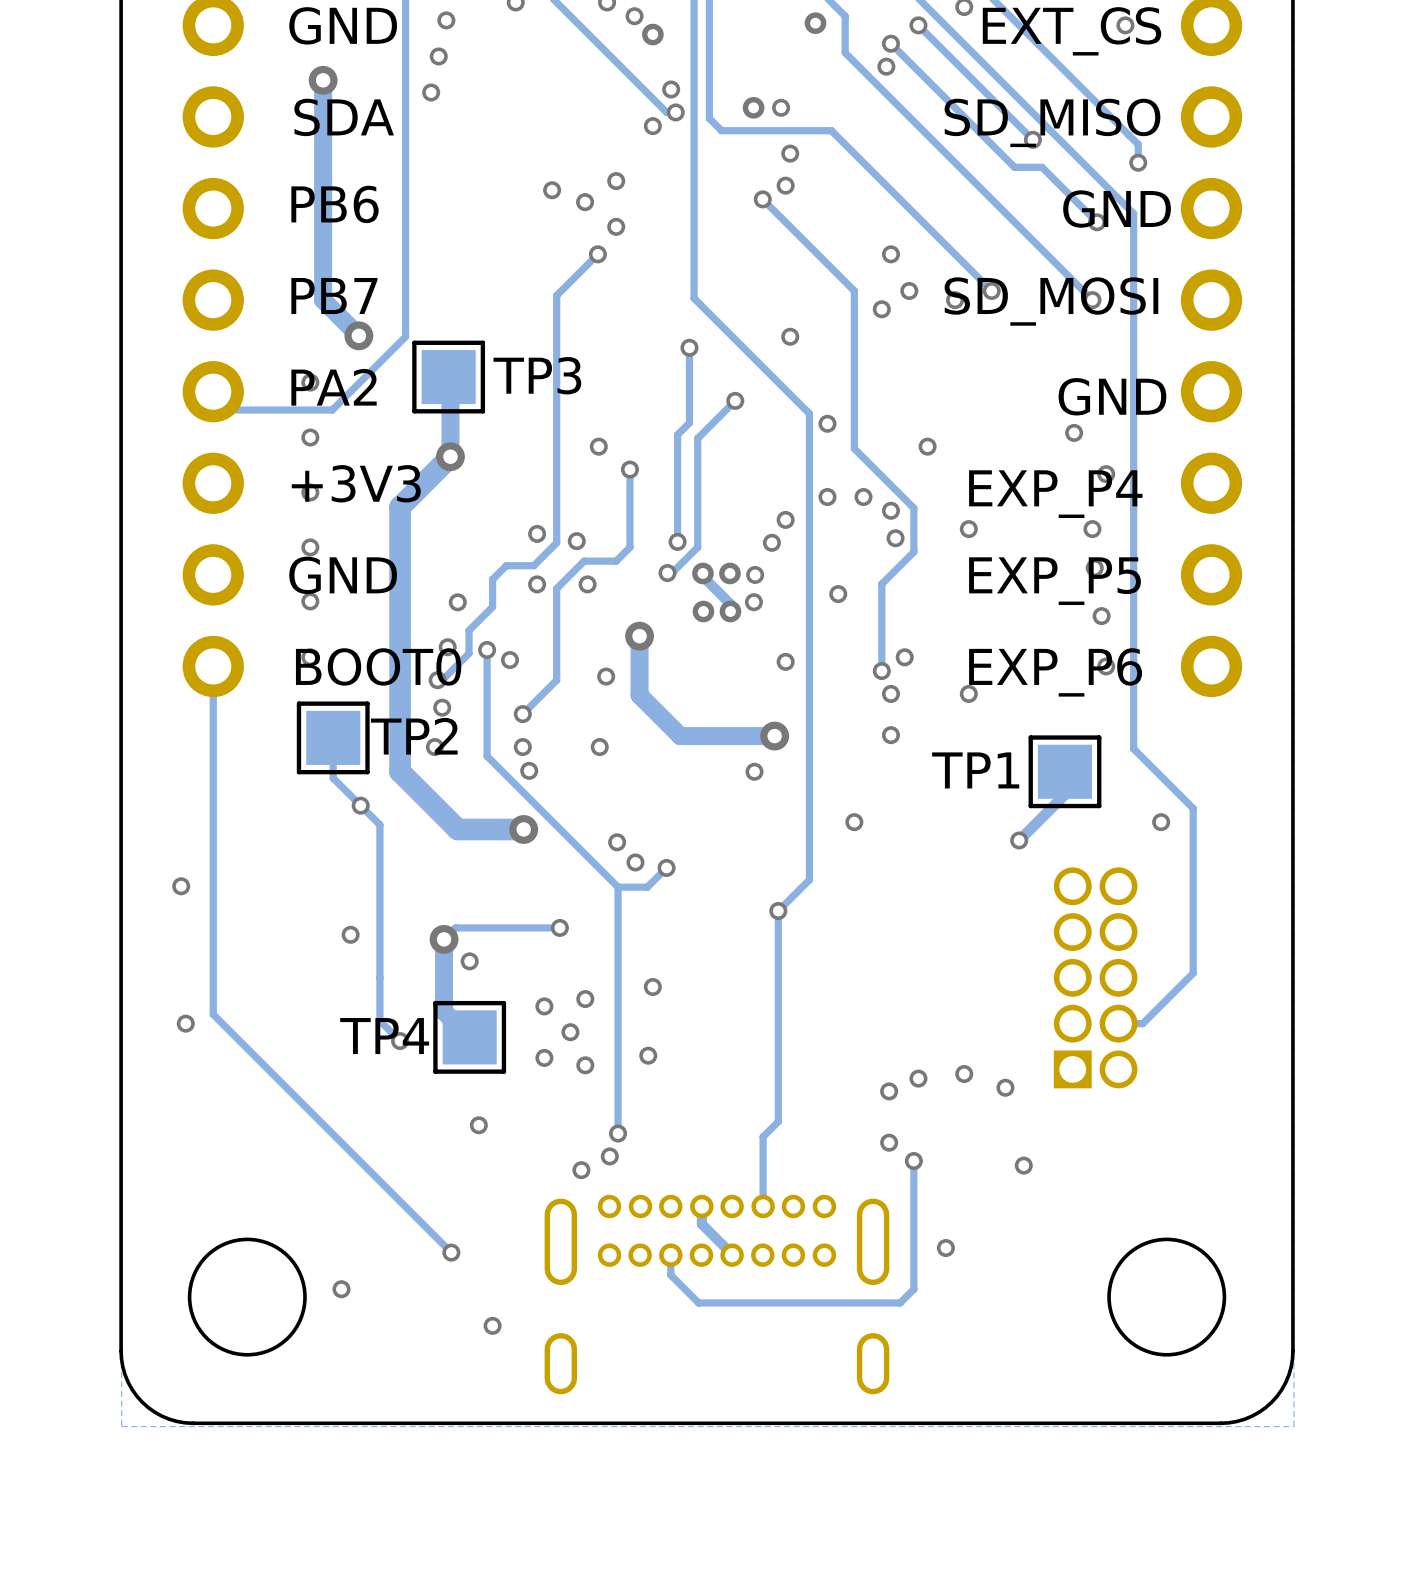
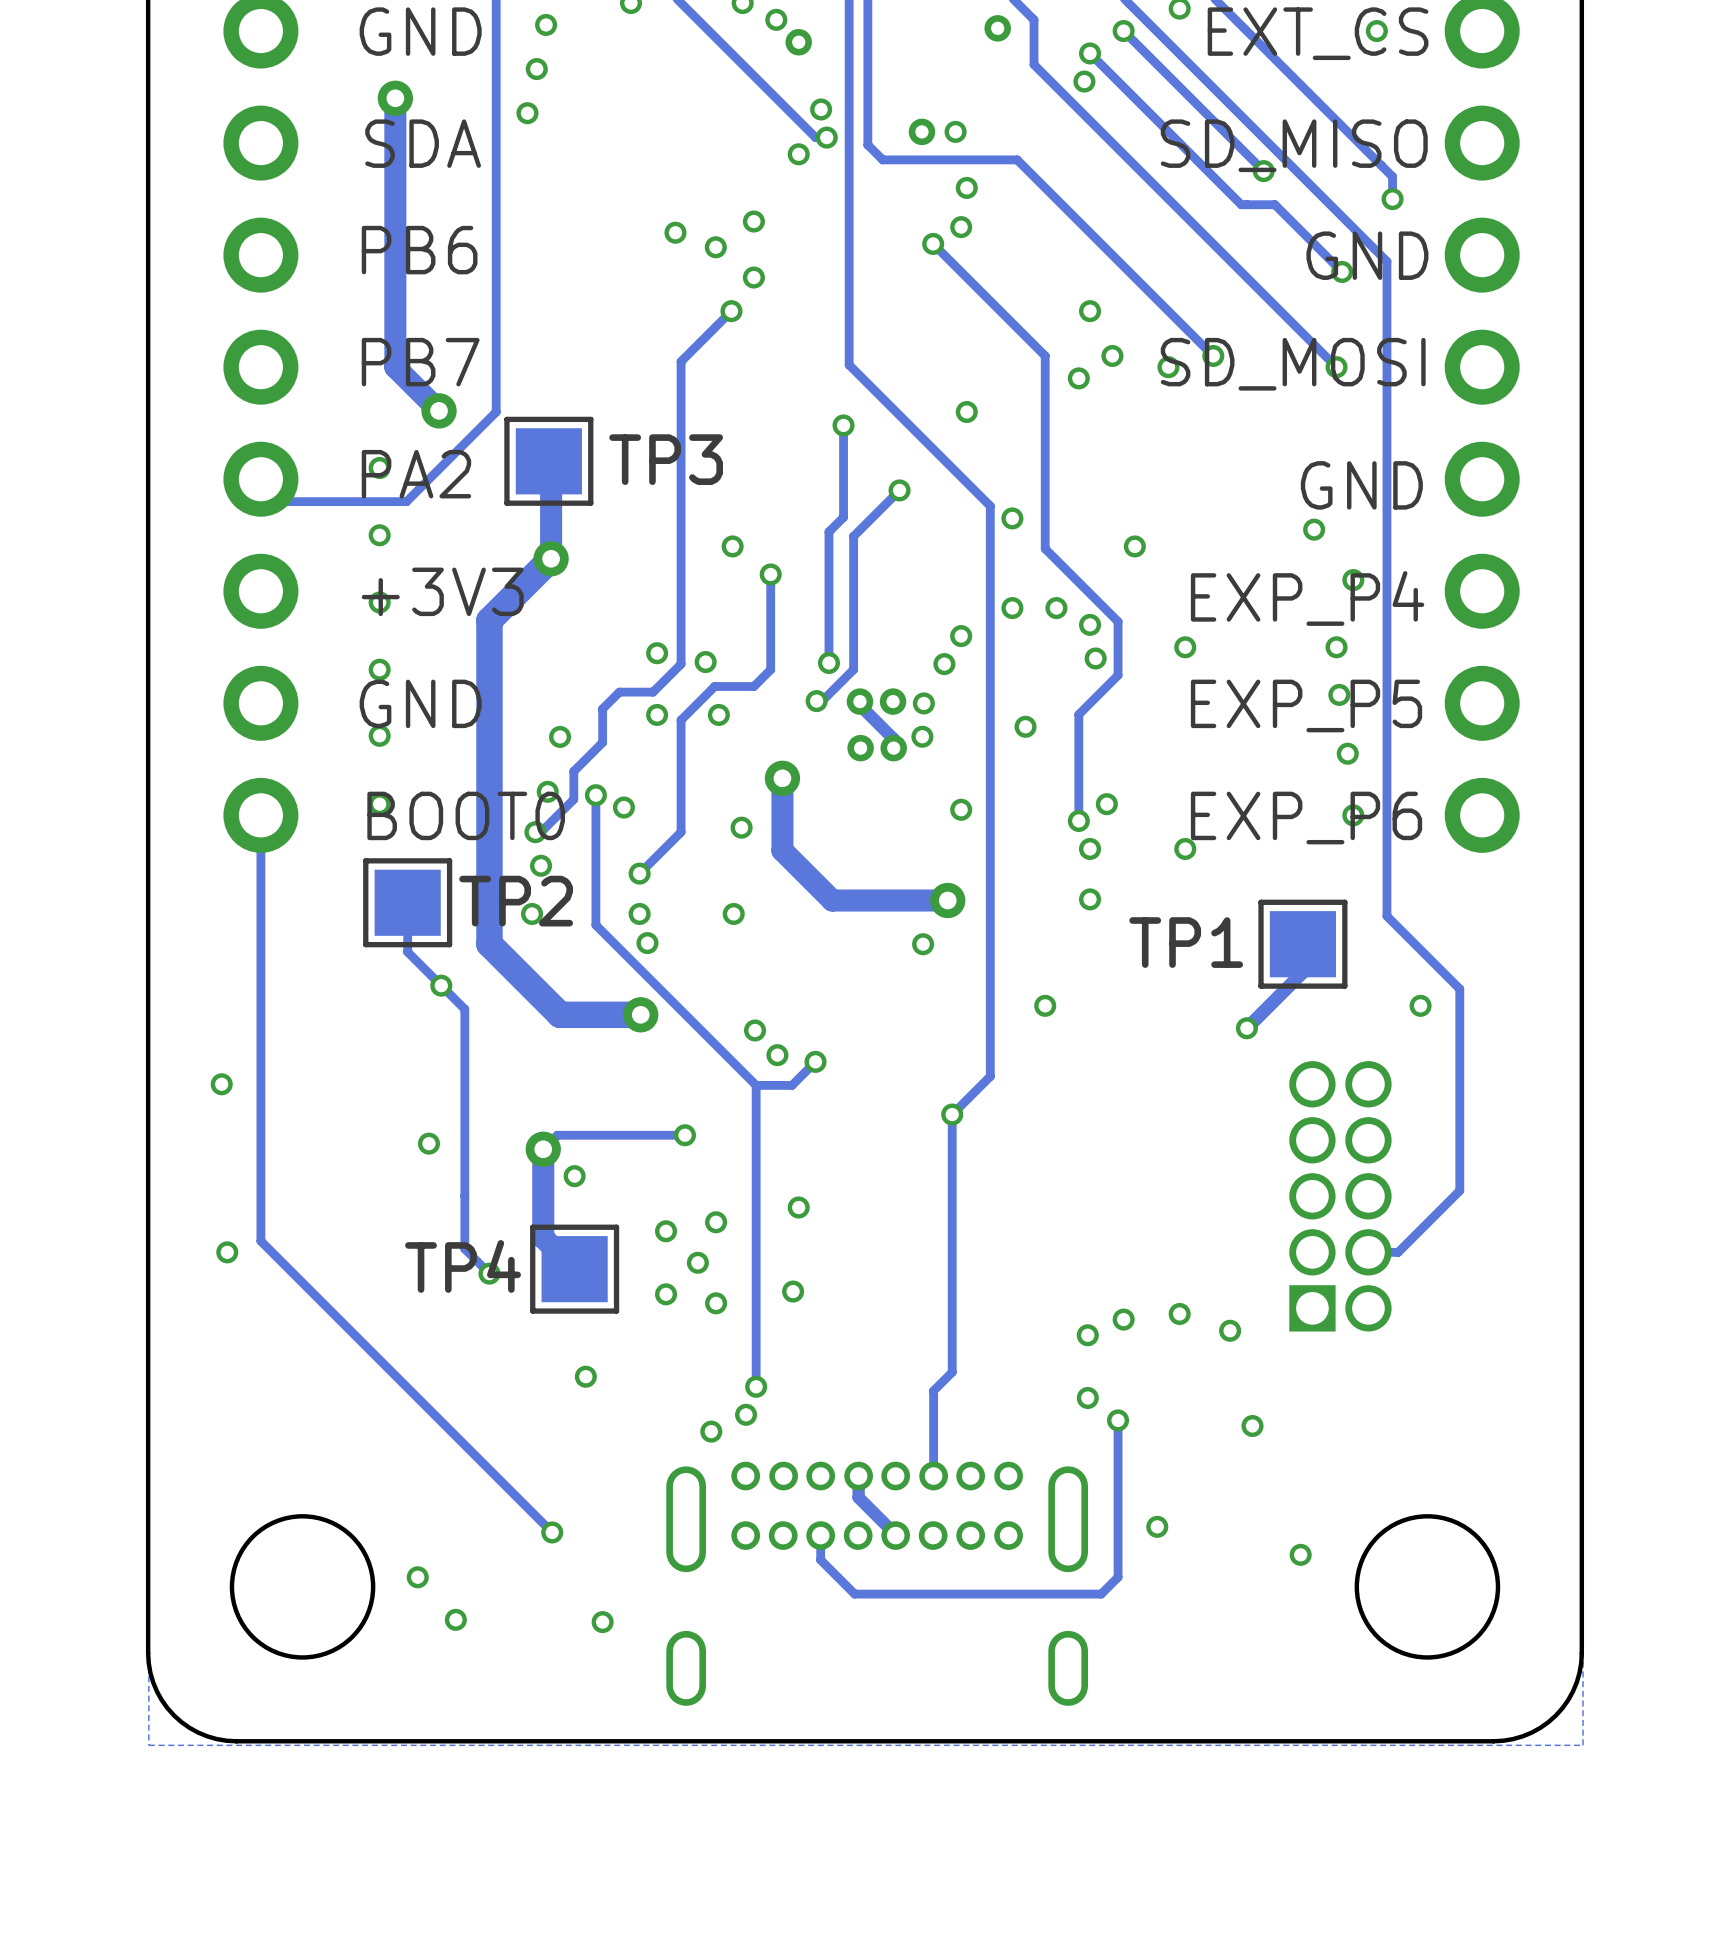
via: none -> (1300, 1554)
via: none -> (455, 1619)

